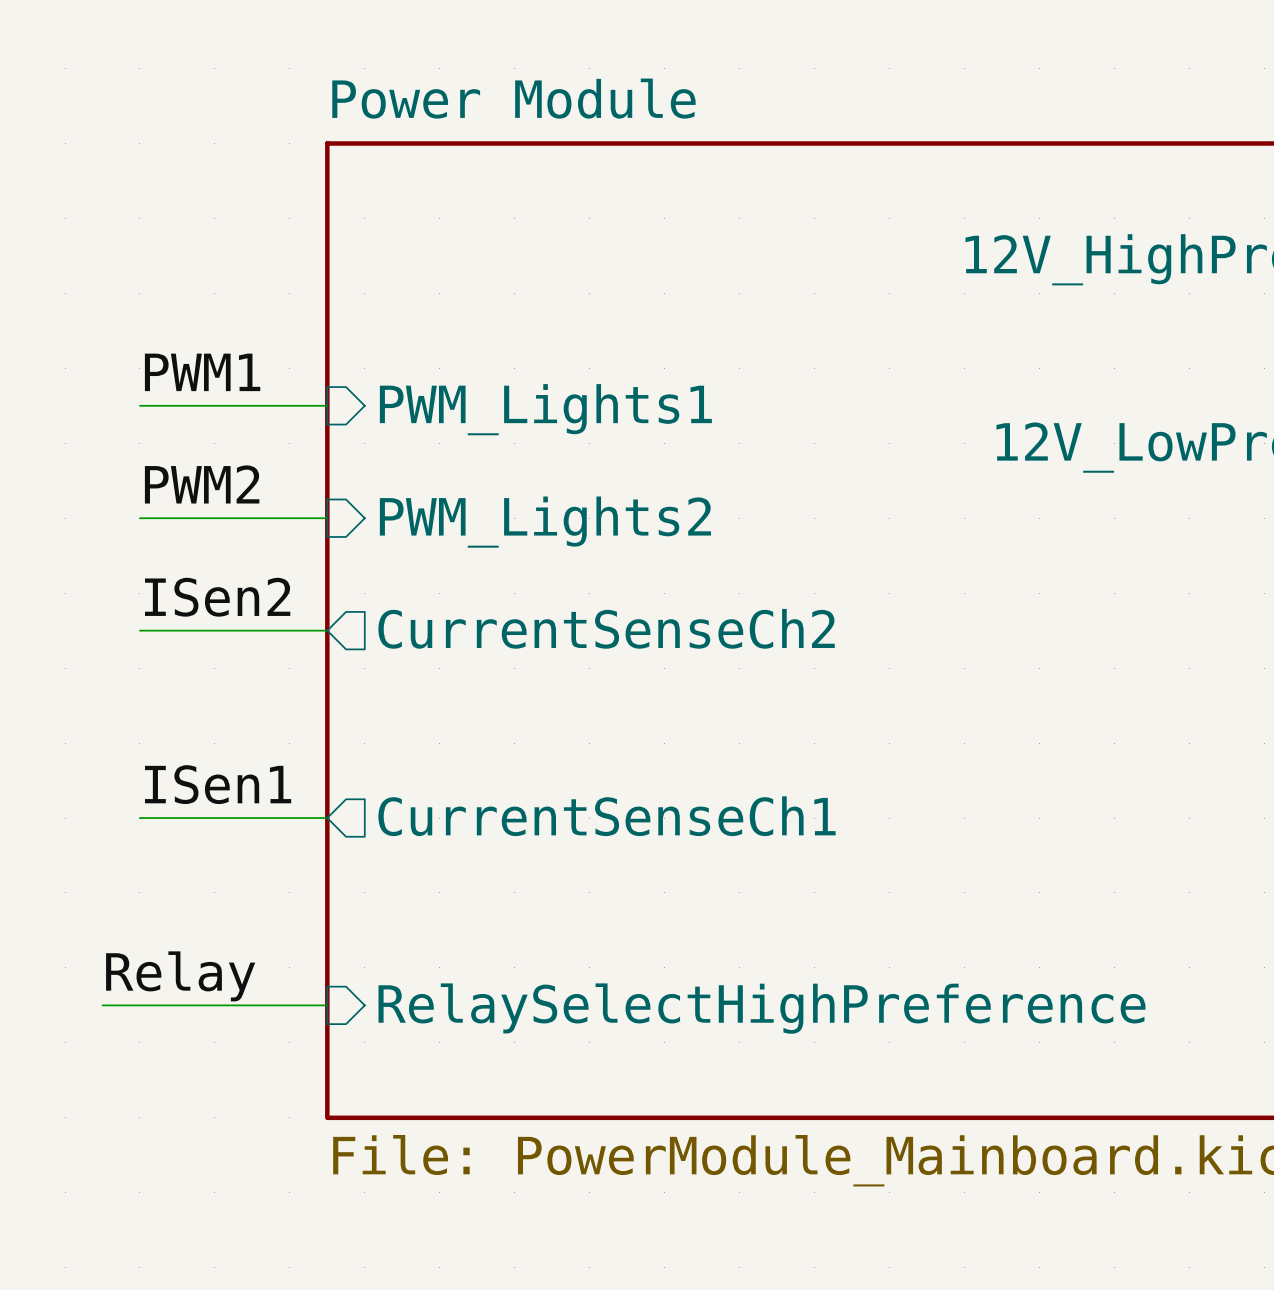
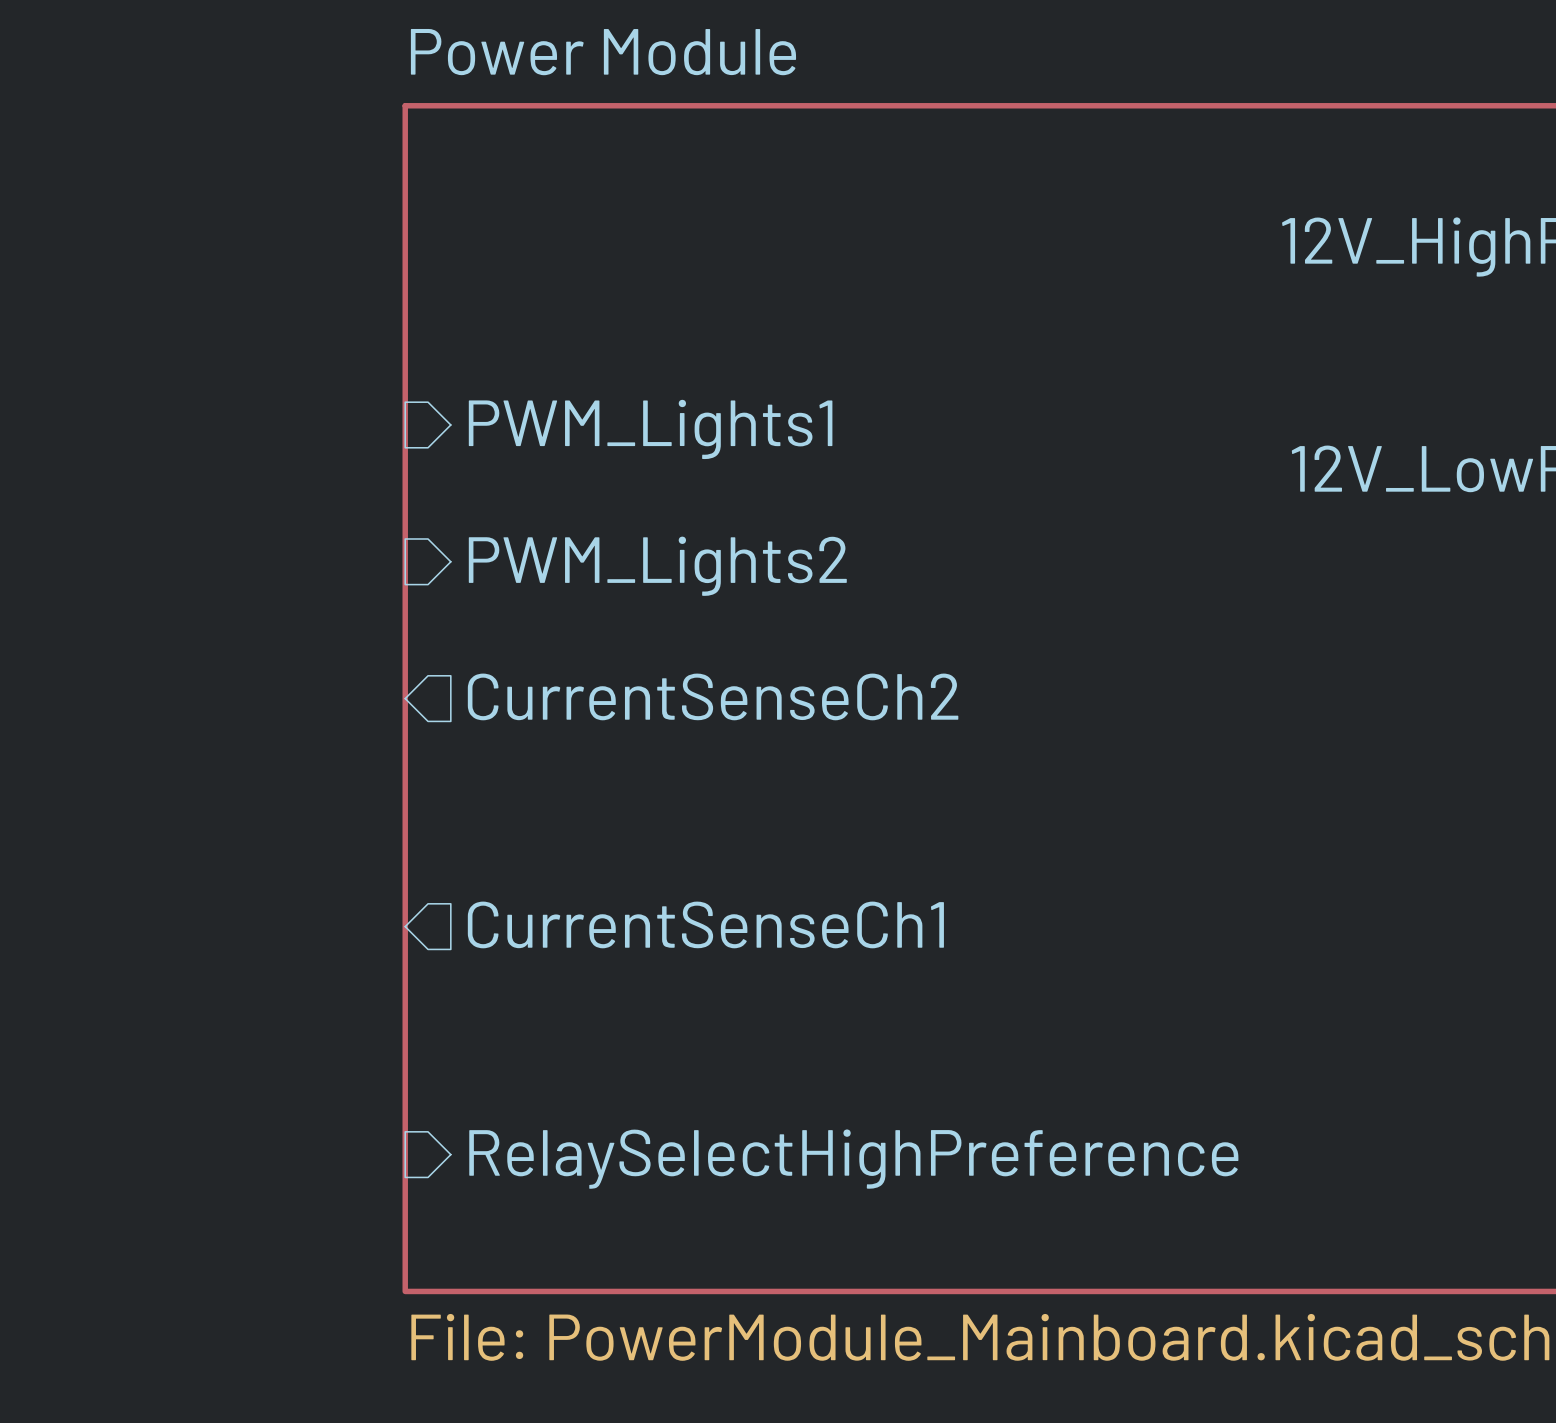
label: PWM1 (202, 372) -> none
wire: (139, 405) (327, 405) -> none
label: PWM2 (202, 484) -> none
wire: (139, 518) (327, 518) -> none
label: ISen2 (217, 597) -> none
wire: (139, 630) (327, 630) -> none
label: ISen1 (218, 784) -> none
wire: (139, 818) (327, 818) -> none
label: Relay (180, 976) -> none
wire: (102, 1005) (327, 1005) -> none

